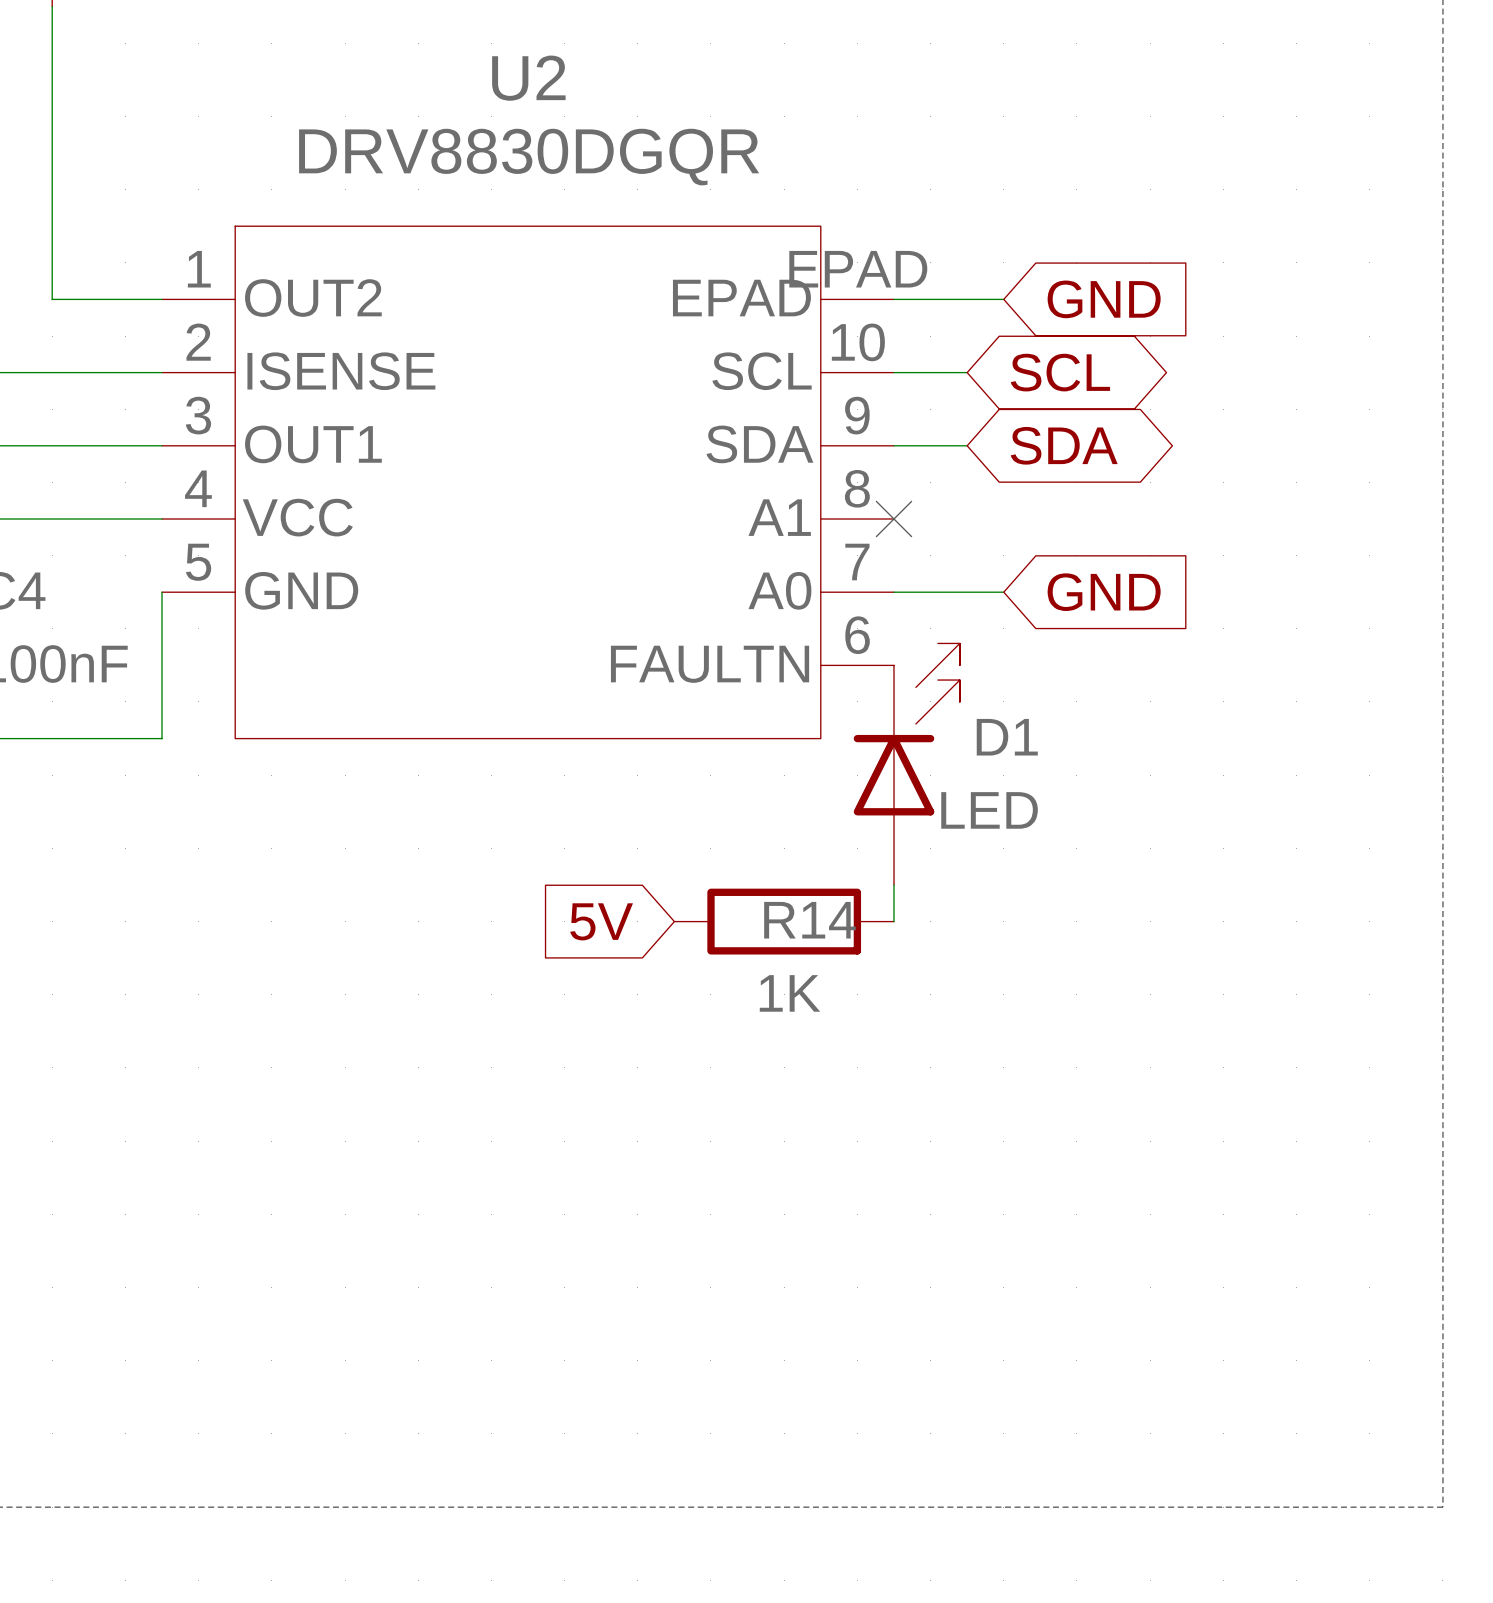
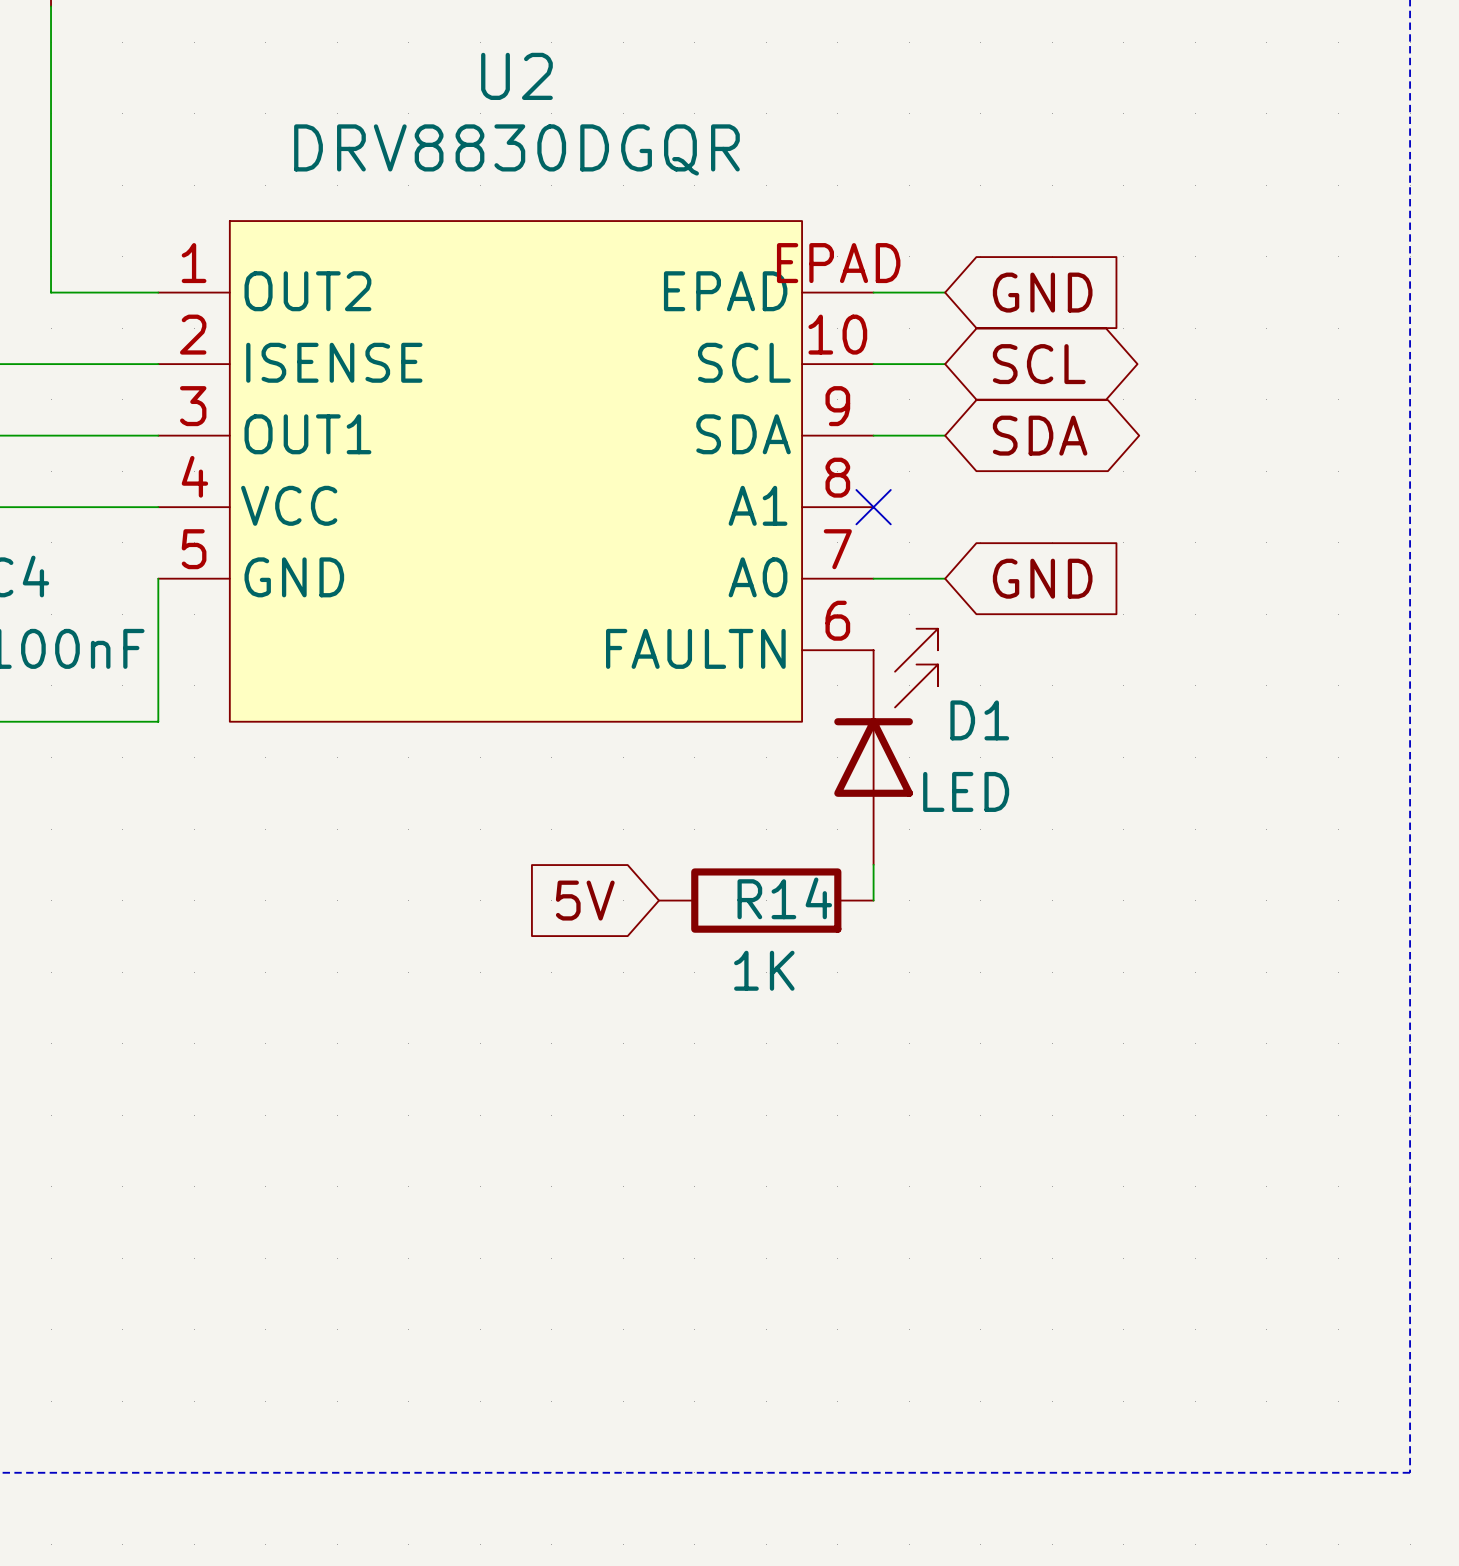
wire: (967, 299) (1003, 299) -> none
global label position: GND (1104, 299) -> GND (1042, 292)
wire: (967, 592) (1003, 592) -> none
global label position: GND (1104, 592) -> GND (1042, 578)

